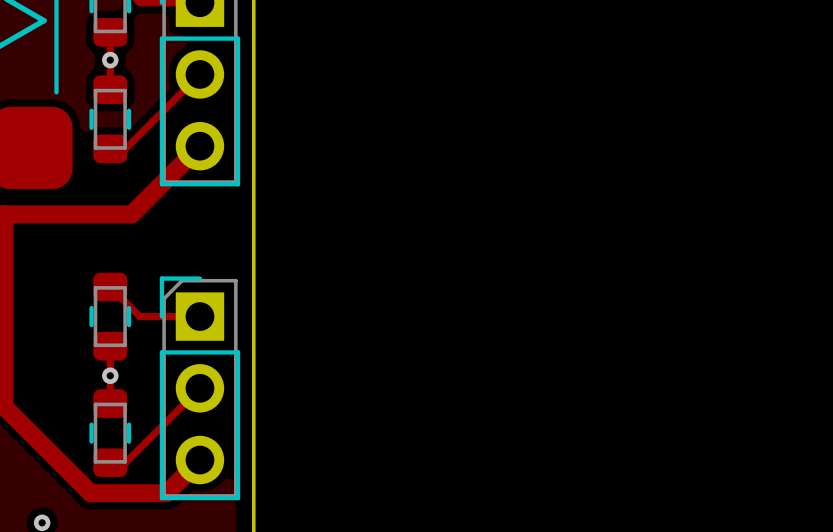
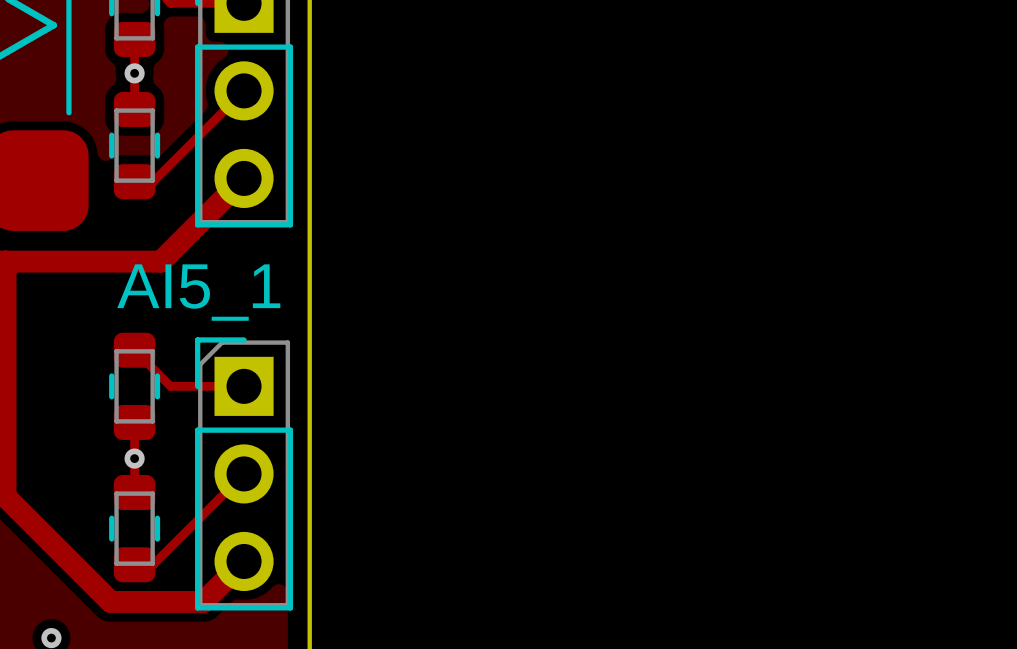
text: none -> AI5_1 (198, 292)

